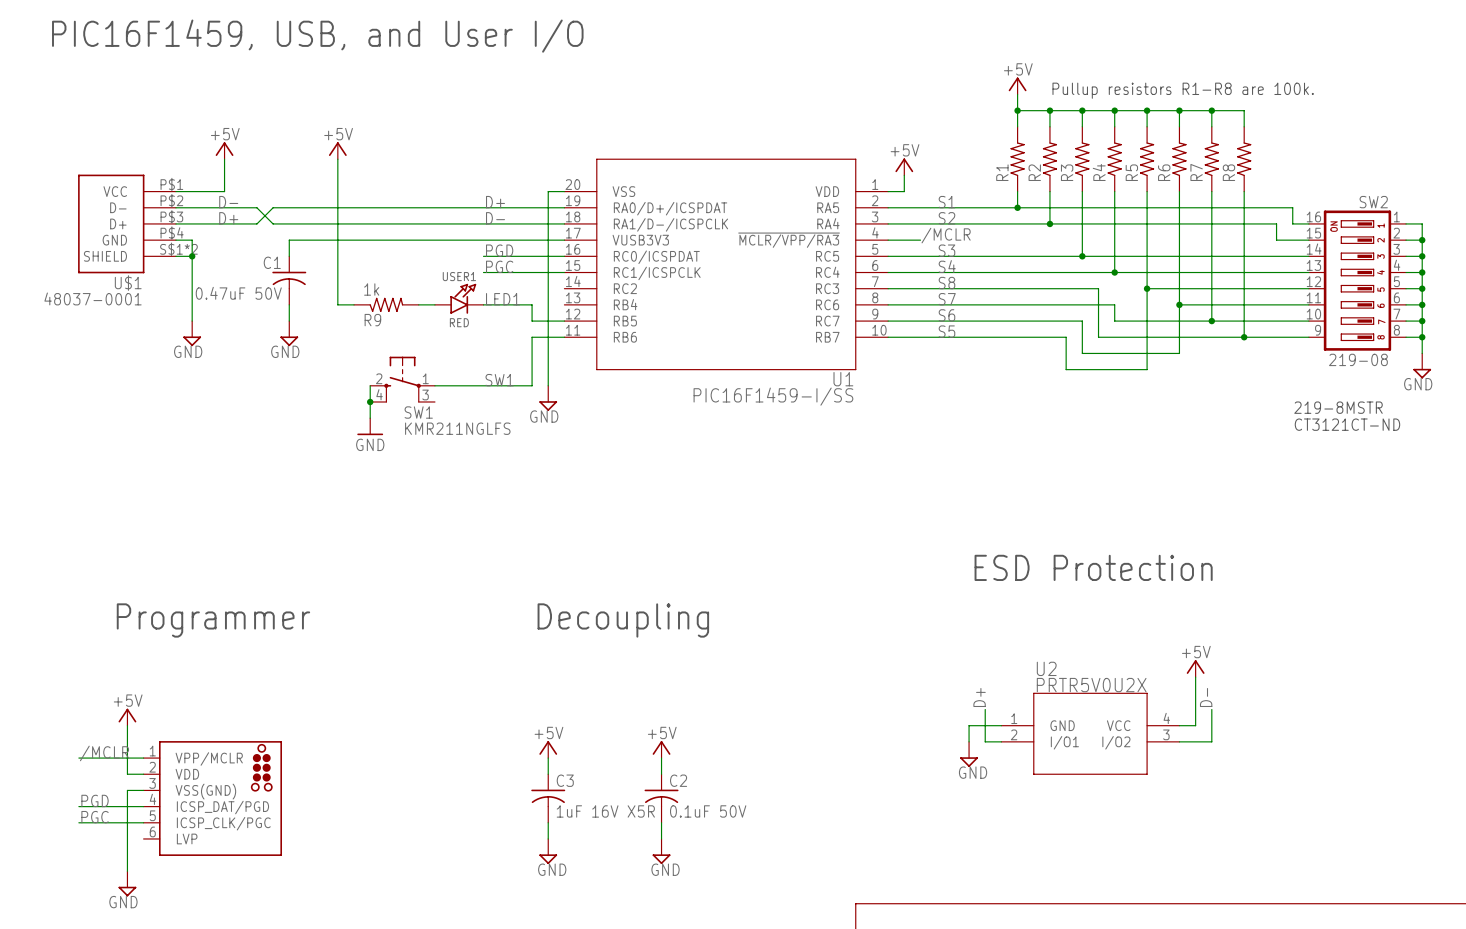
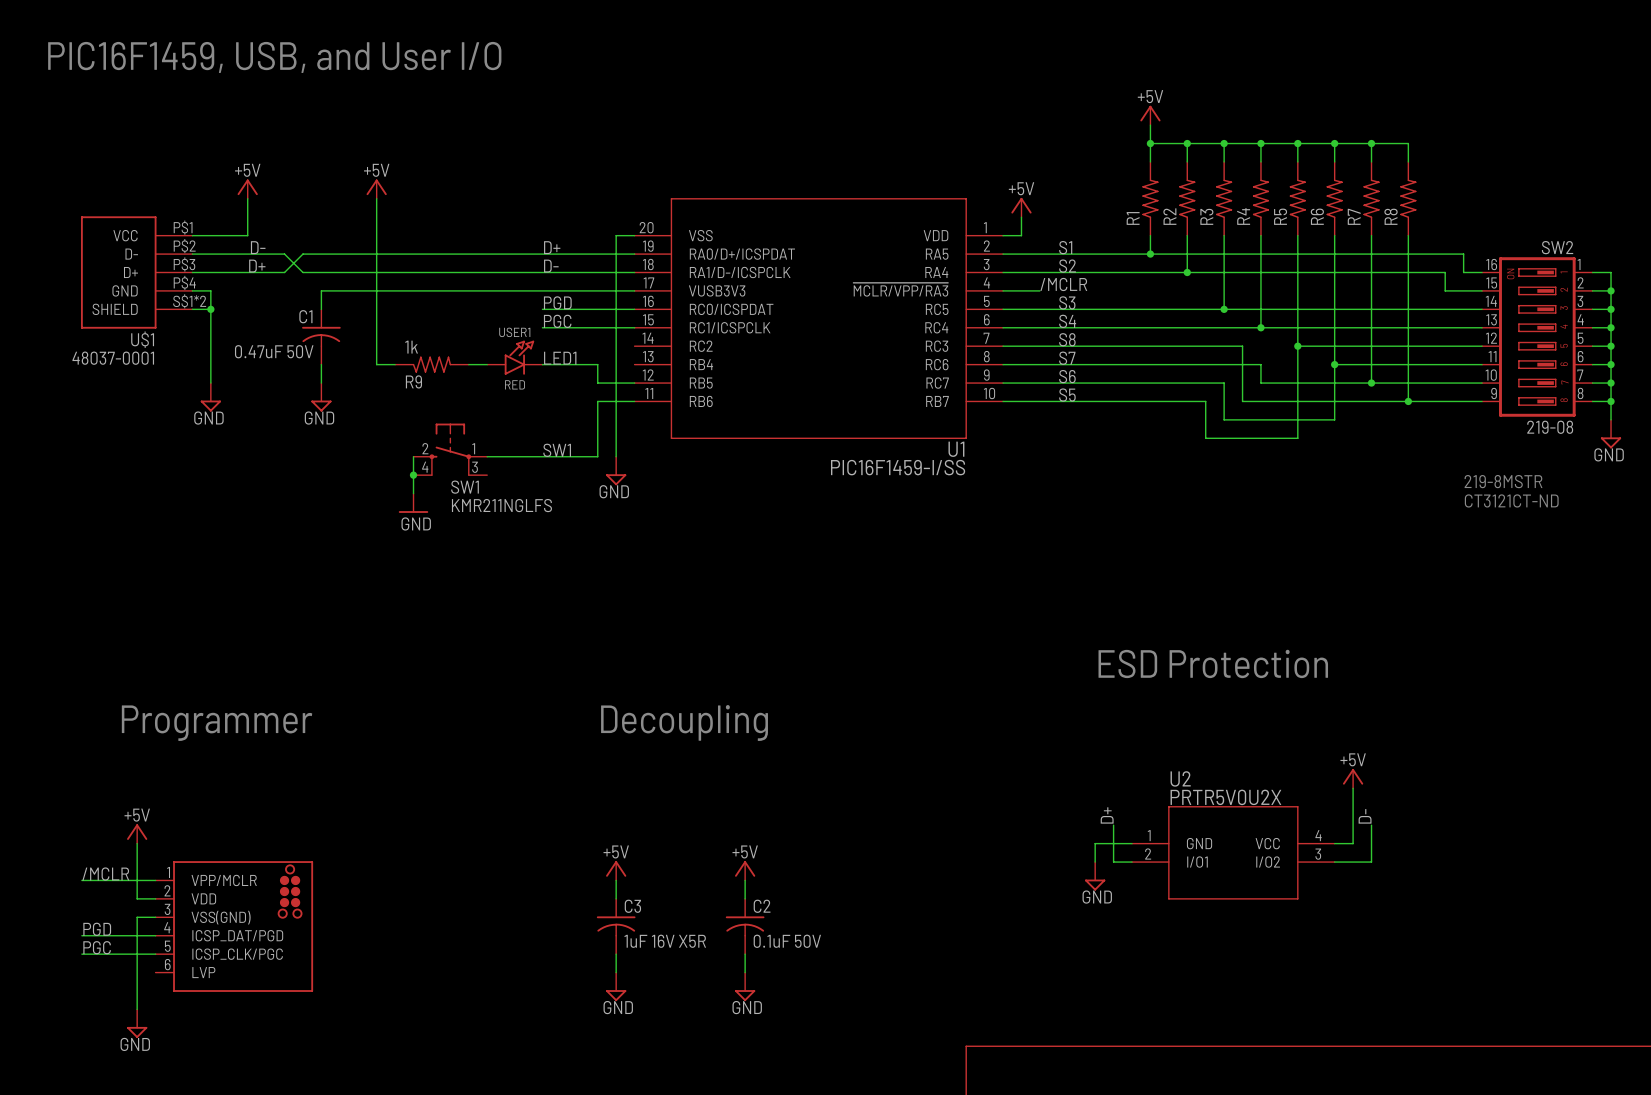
text: Pullup resistors R1-R8 are 100k. (1183, 90) -> none

